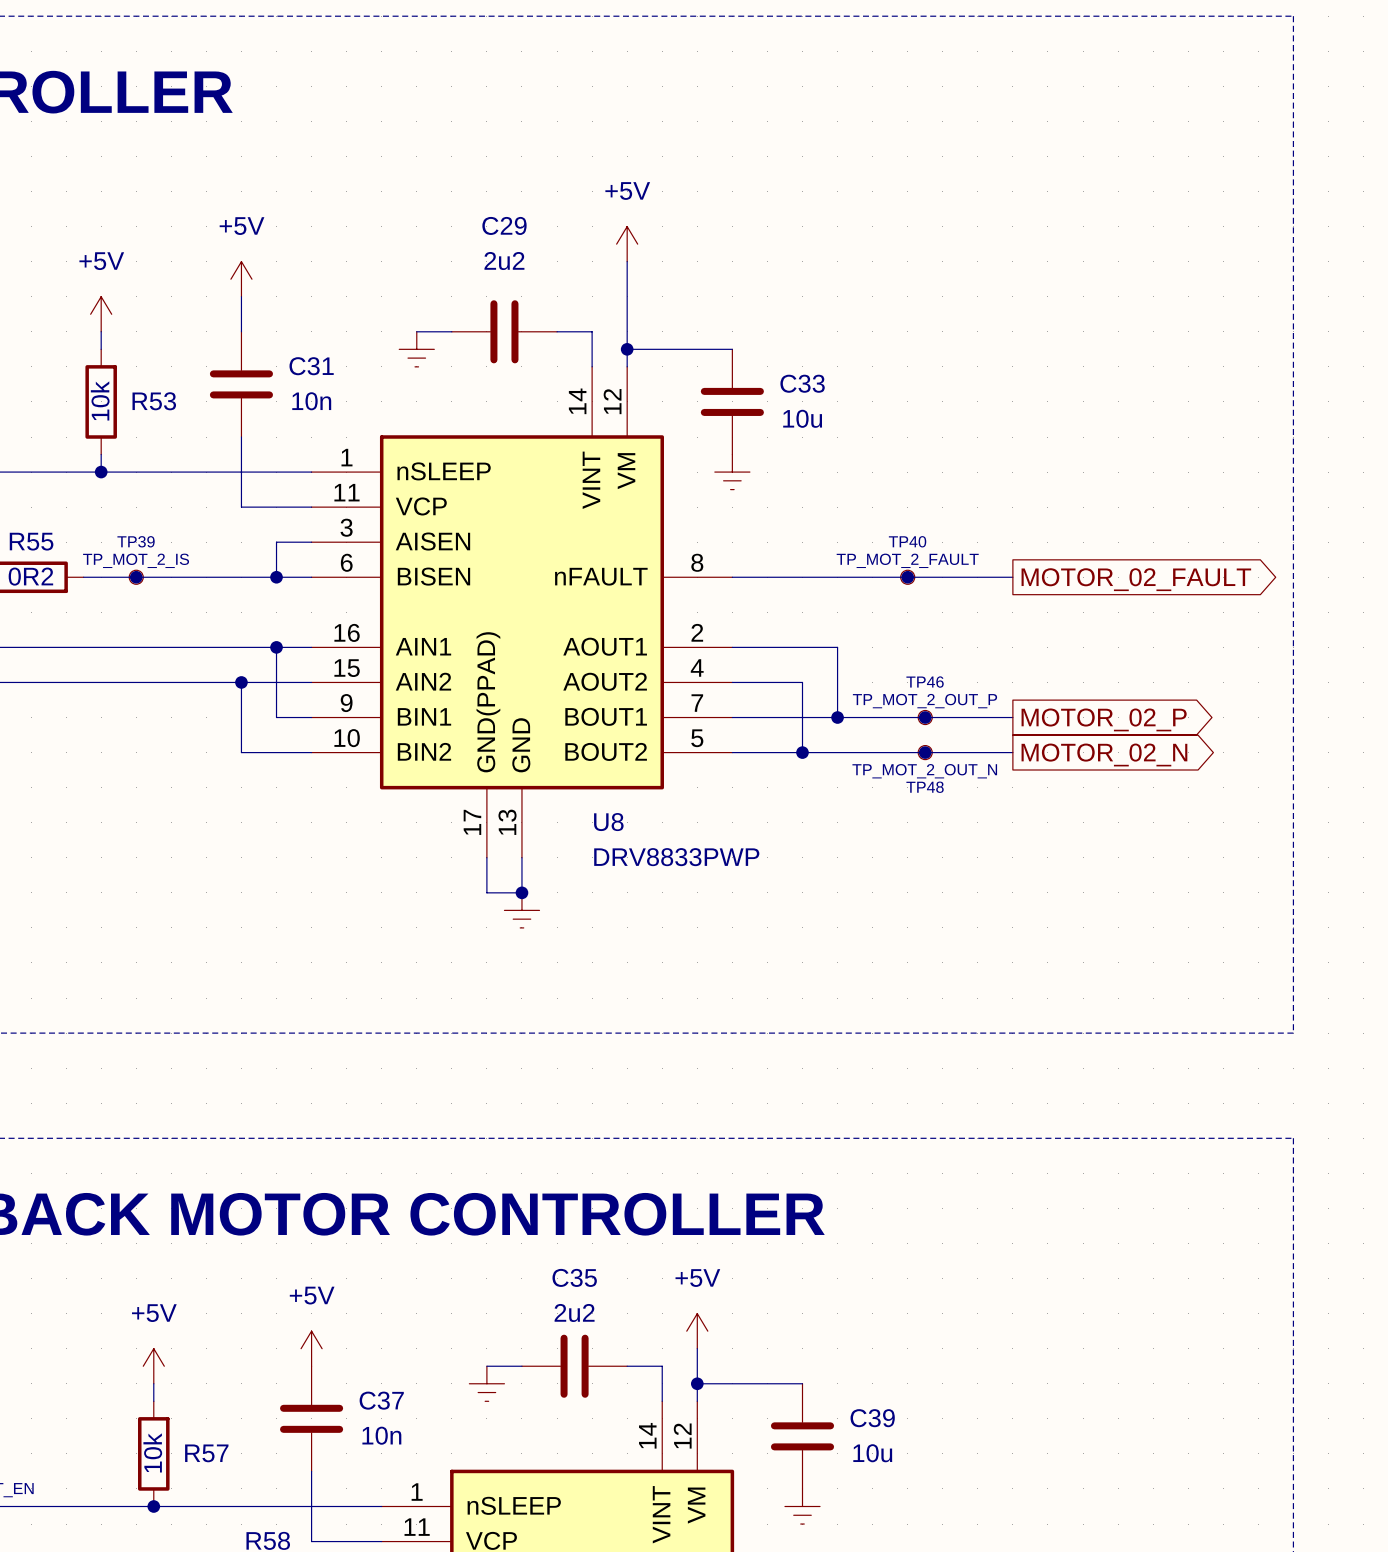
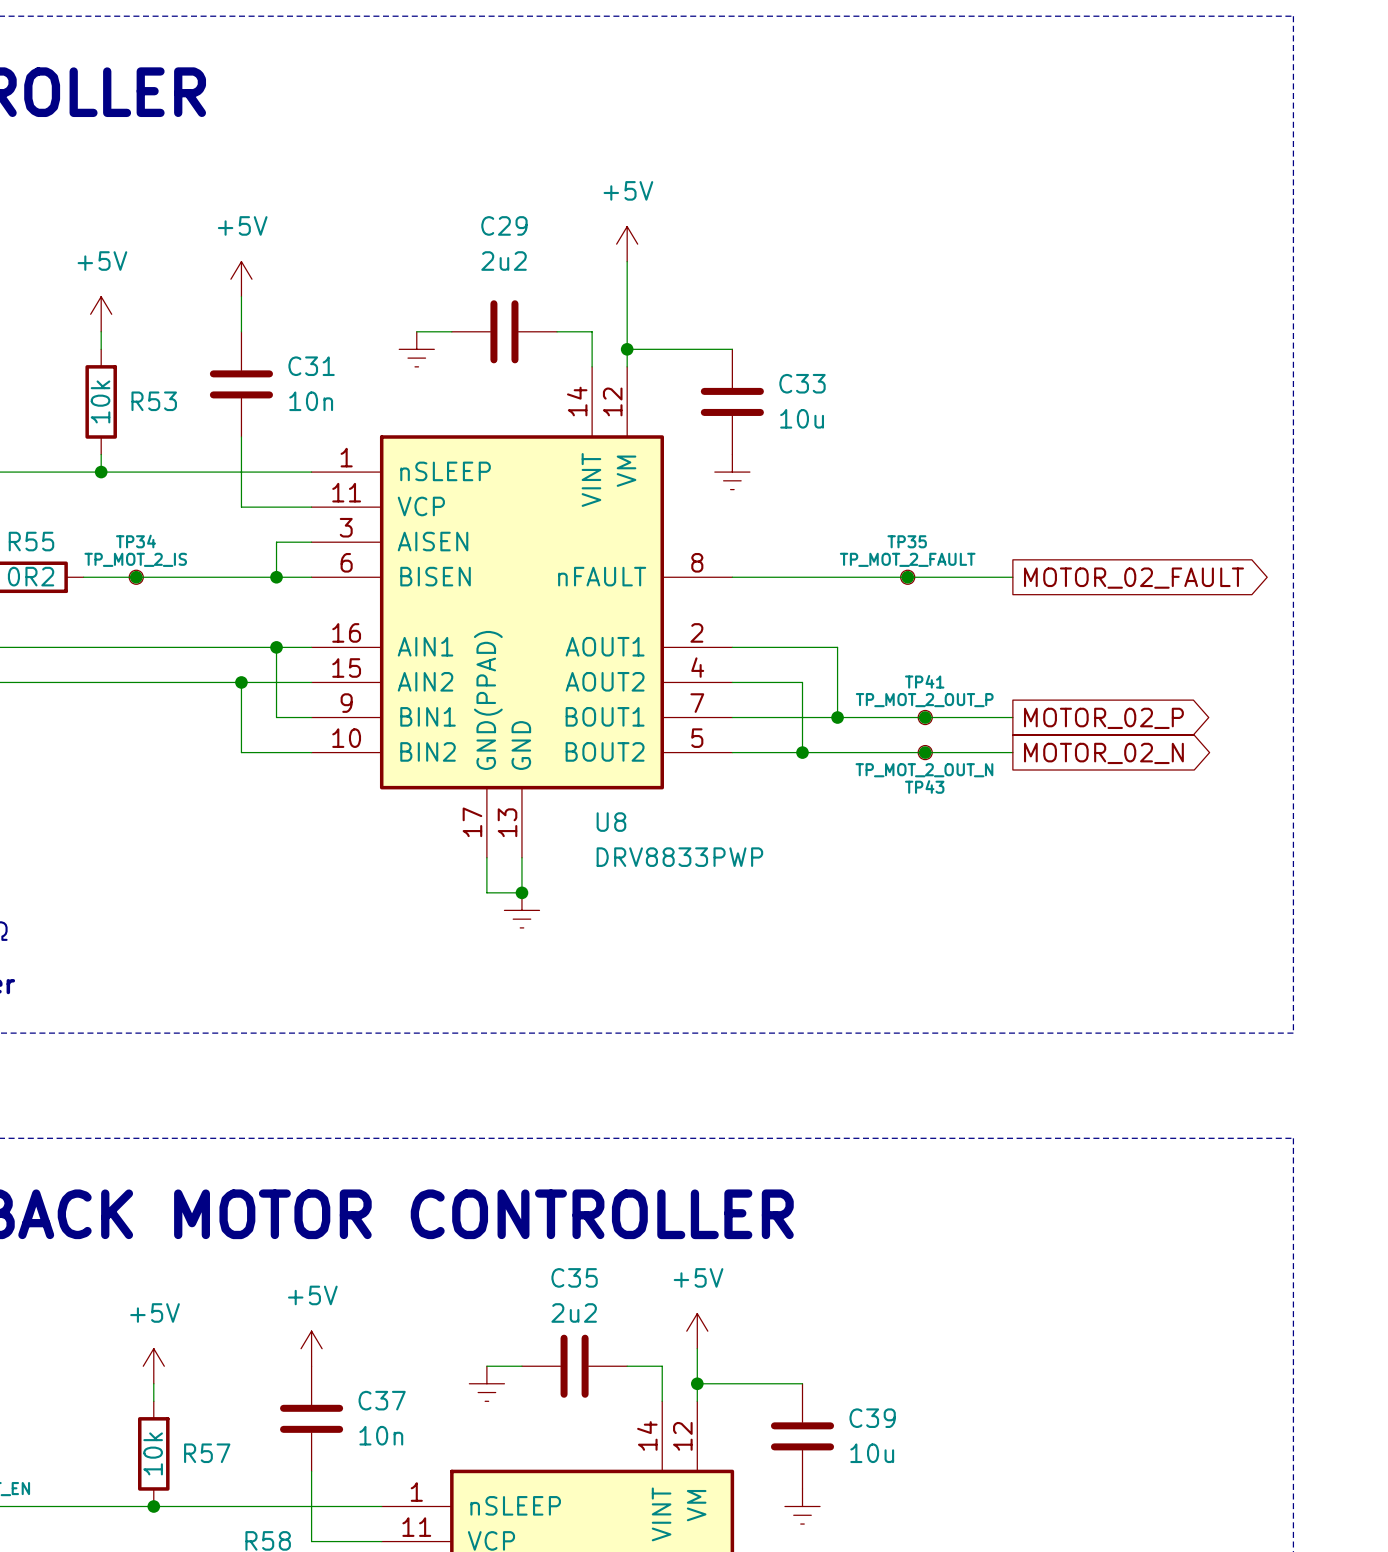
TP39 name: TP39 (136, 541) -> TP34 (135, 541)
TP40 name: TP40 (907, 541) -> TP35 (907, 541)
TP46 name: TP46 (925, 682) -> TP41 (924, 681)
TP48 name: TP48 (925, 787) -> TP43 (924, 786)

